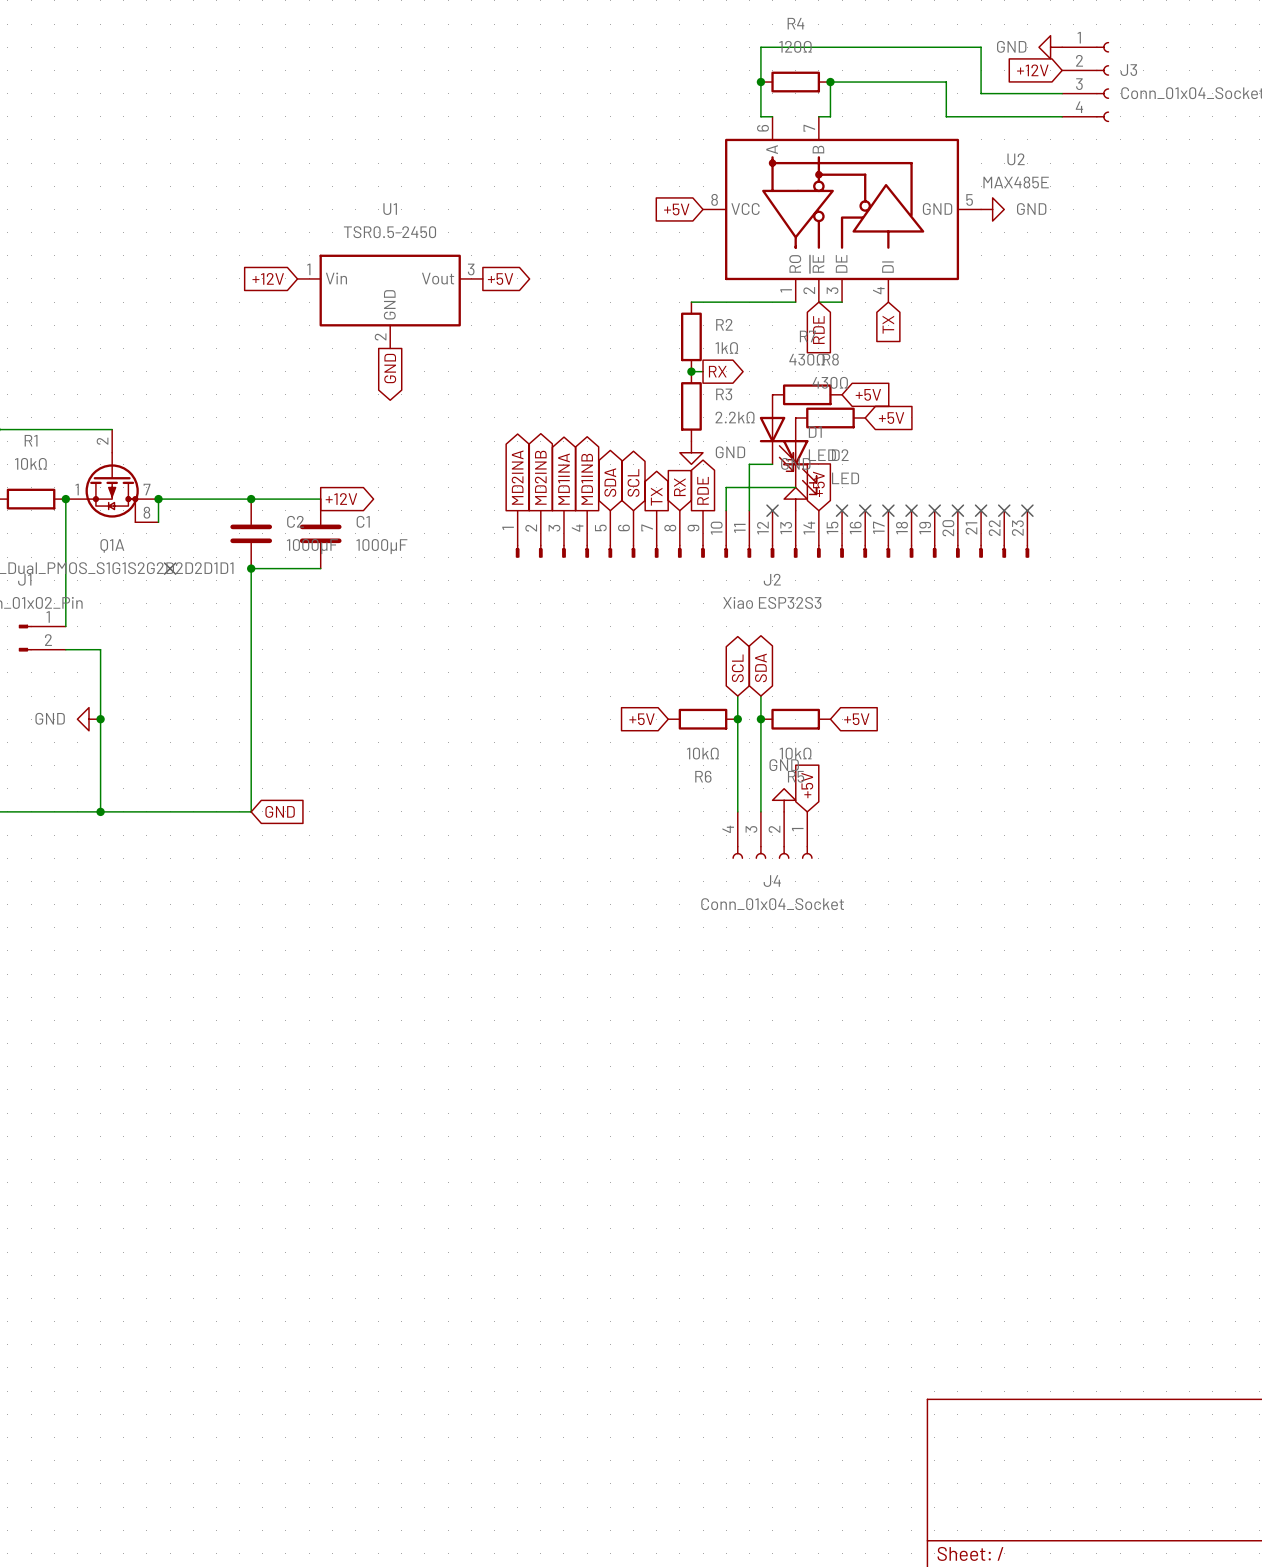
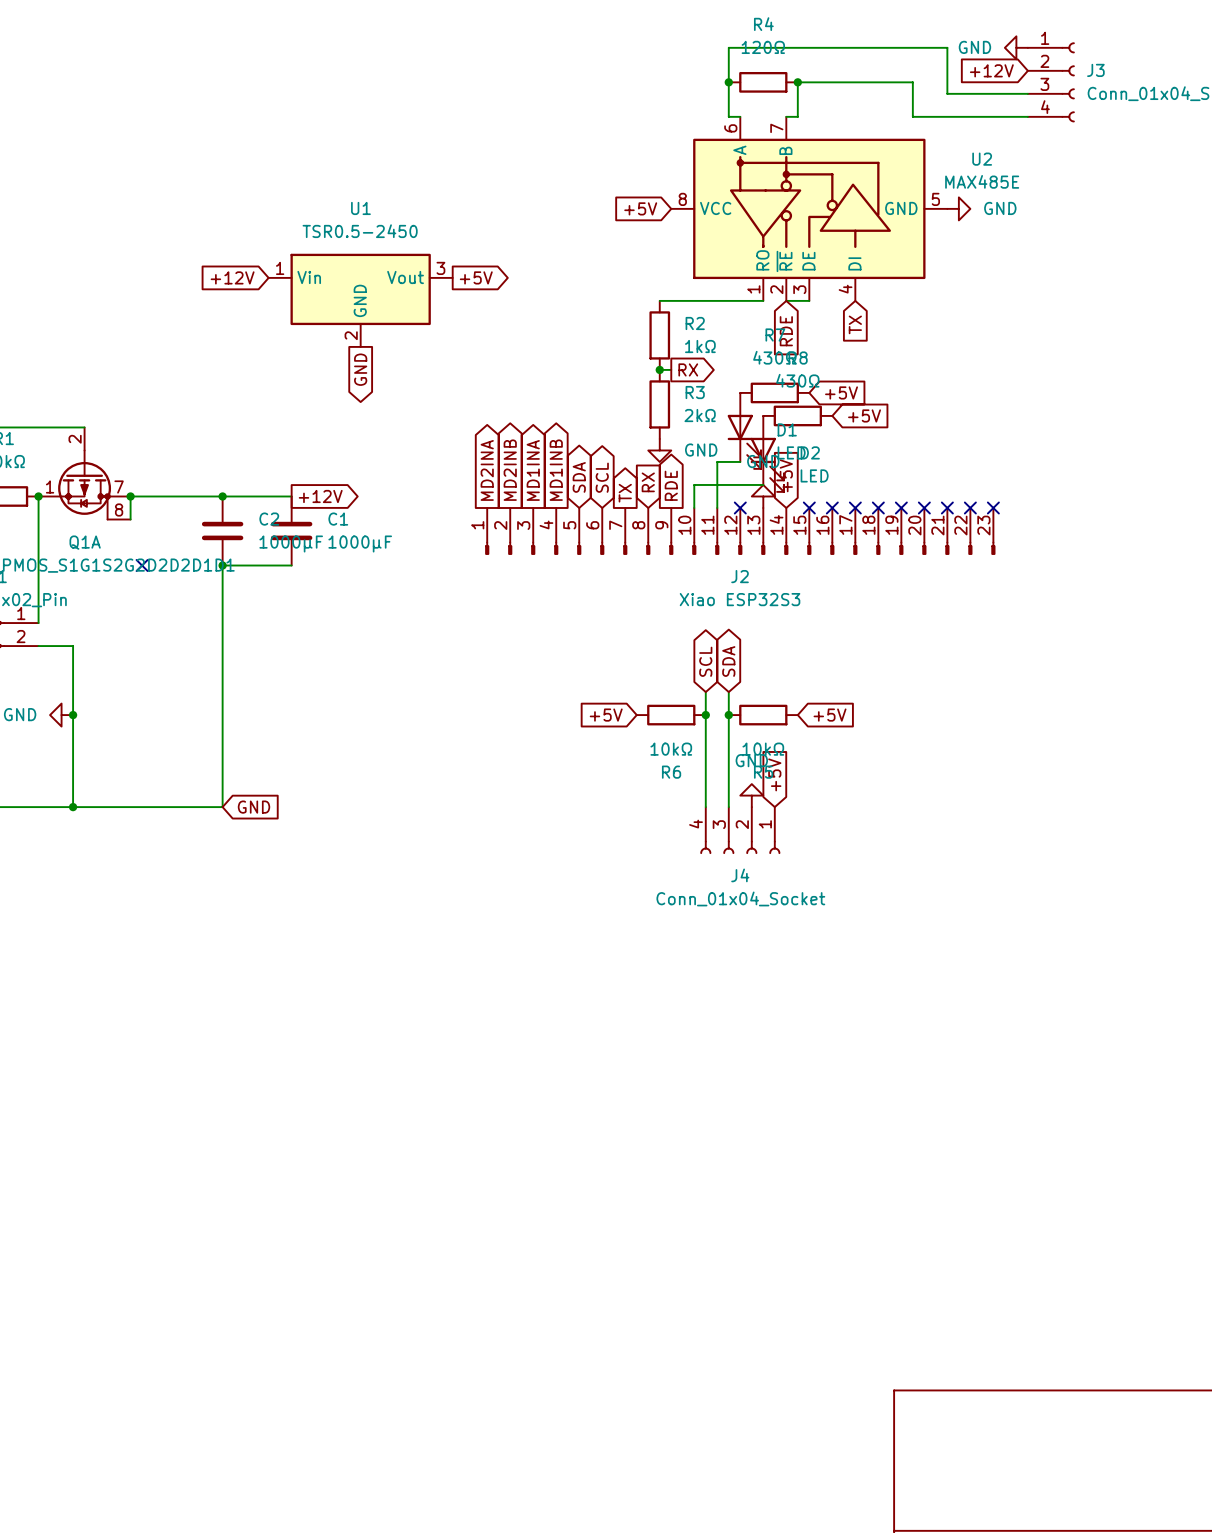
R3 value: 2.2kΩ (735, 417) -> 2kΩ (700, 415)

